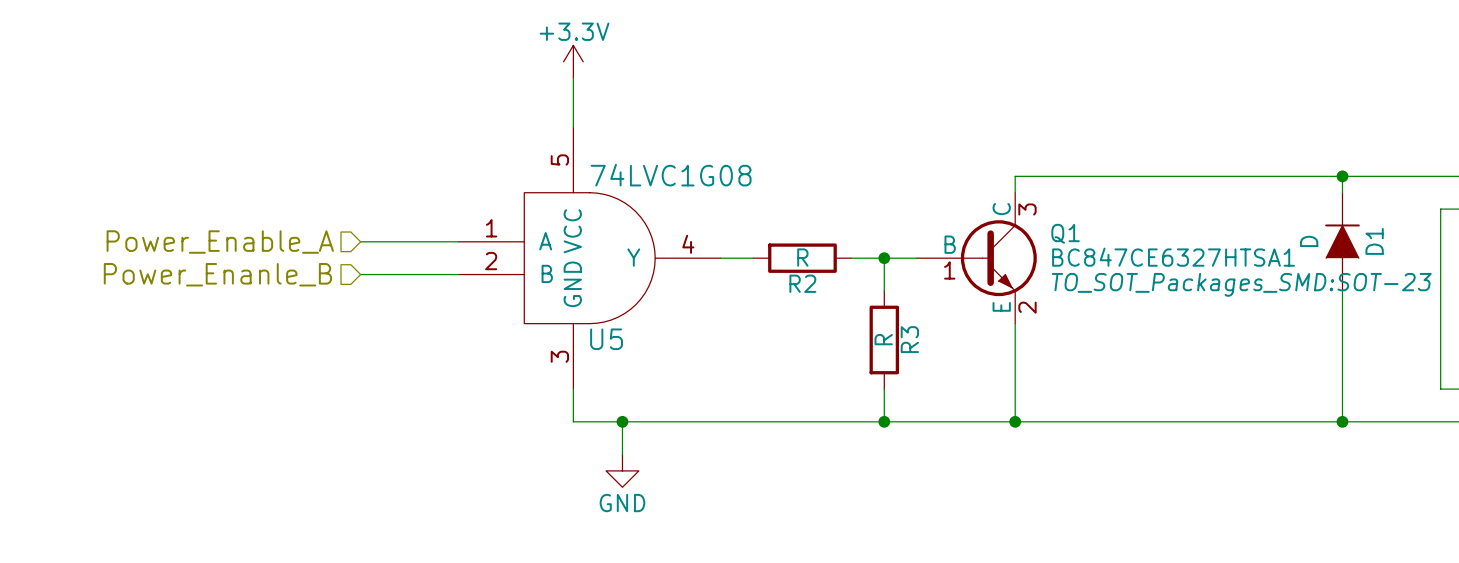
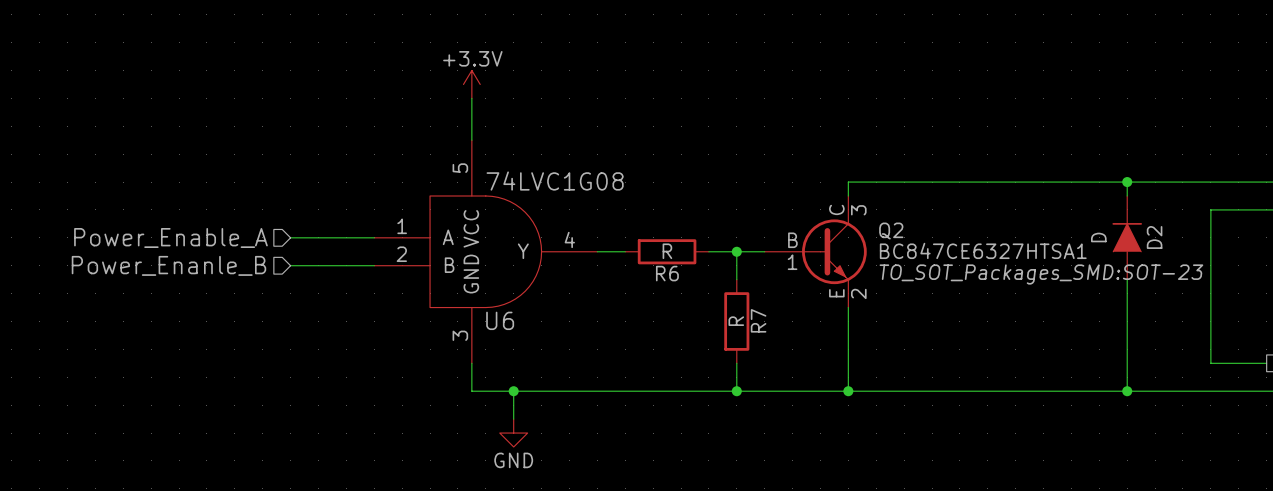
Q1 name: Q1 (1065, 233) -> Q2 (891, 231)
D1 name: D1 (1374, 241) -> D2 (1154, 237)
R2 name: R2 (802, 283) -> R6 (667, 273)
U5 name: U5 (606, 339) -> U6 (500, 320)
R3 name: R3 (909, 339) -> R7 (758, 320)

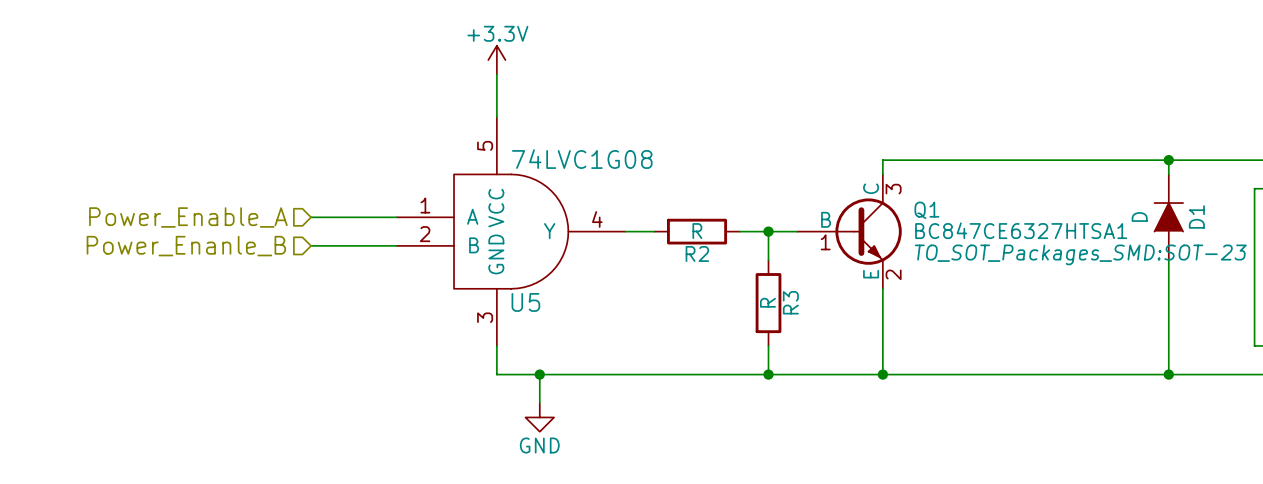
Q2 name: Q2 (891, 231) -> Q1 (926, 210)
D2 name: D2 (1154, 237) -> D1 (1196, 216)
R6 name: R6 (667, 273) -> R2 (697, 253)
U6 name: U6 (500, 320) -> U5 (525, 302)
R7 name: R7 (758, 320) -> R3 (790, 302)

